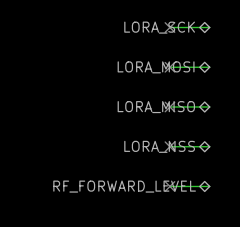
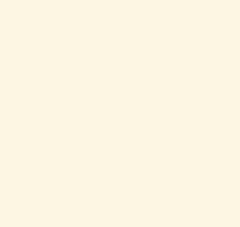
hierarchical label: LORA_SCK (159, 27) -> none
wire: (169, 27) (209, 27) -> none
no-connect mark: (169, 27) -> none
hierarchical label: LORA_MOSI (156, 67) -> none
wire: (169, 67) (209, 67) -> none
no-connect mark: (169, 67) -> none
wire: (169, 106) (209, 106) -> none
no-connect mark: (169, 106) -> none
hierarchical label: LORA_MISO (156, 107) -> none
hierarchical label: LORA_NSS (159, 146) -> none
wire: (169, 146) (209, 146) -> none
no-connect mark: (169, 146) -> none
hierarchical label: RF_FORWARD_LEVEL (124, 186) -> none
wire: (169, 186) (209, 186) -> none
no-connect mark: (169, 186) -> none

